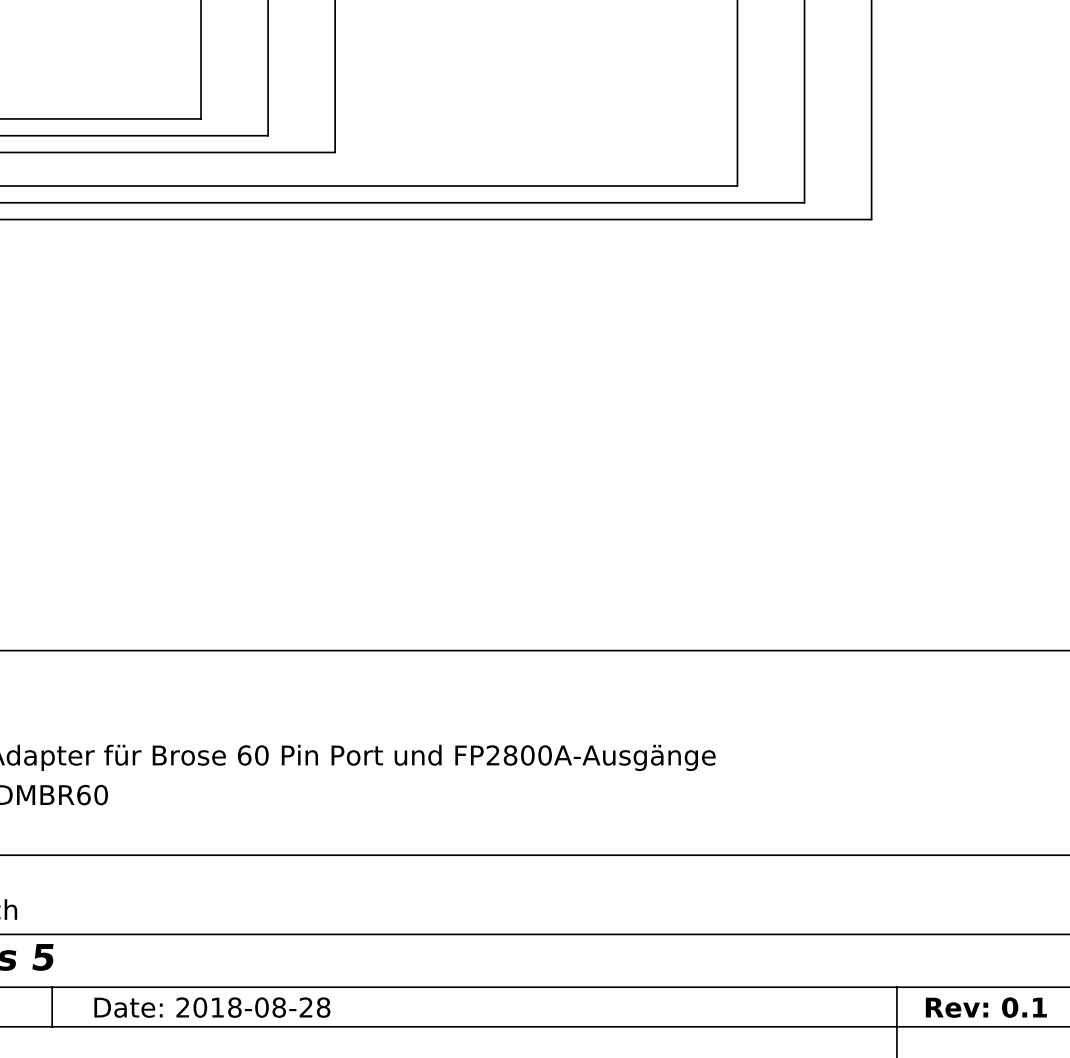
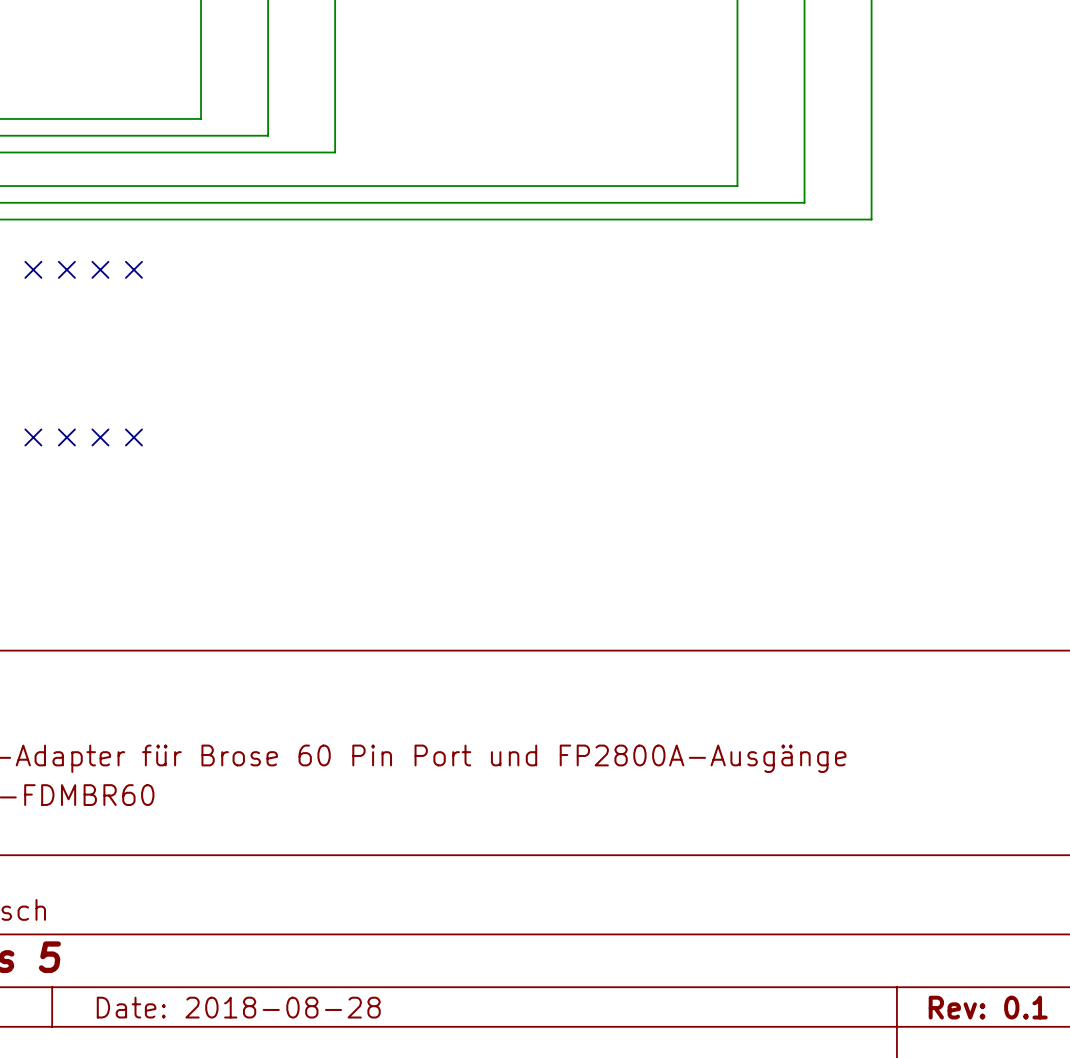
no-connect mark: none -> (33, 269)
no-connect mark: none -> (66, 269)
no-connect mark: none -> (100, 269)
no-connect mark: none -> (133, 269)
no-connect mark: none -> (33, 437)
no-connect mark: none -> (66, 437)
no-connect mark: none -> (100, 437)
no-connect mark: none -> (133, 437)

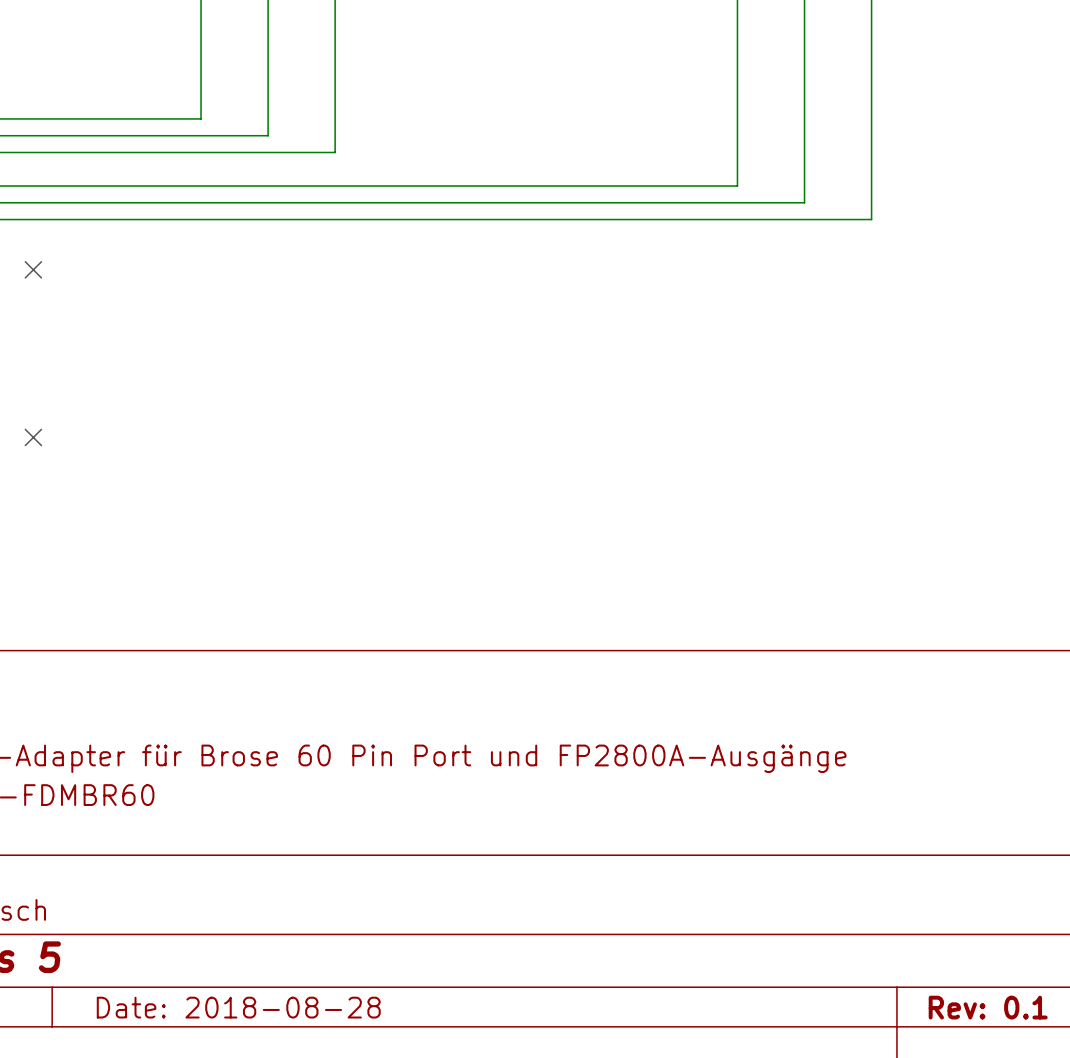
no-connect mark: (66, 269) -> none
no-connect mark: (100, 269) -> none
no-connect mark: (133, 269) -> none
no-connect mark: (66, 437) -> none
no-connect mark: (100, 437) -> none
no-connect mark: (133, 437) -> none

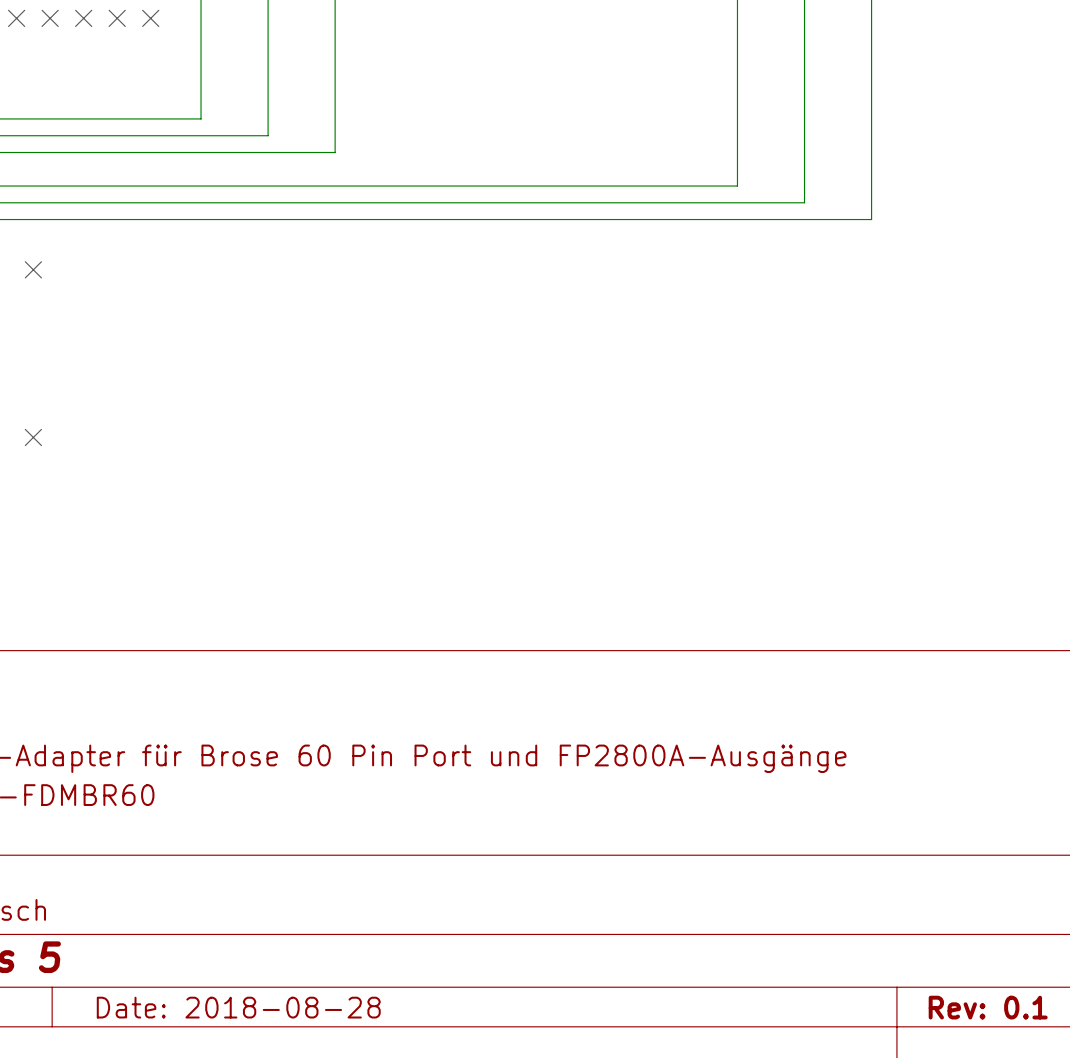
no-connect mark: none -> (16, 18)
no-connect mark: none -> (50, 18)
no-connect mark: none -> (83, 18)
no-connect mark: none -> (117, 18)
no-connect mark: none -> (150, 18)

